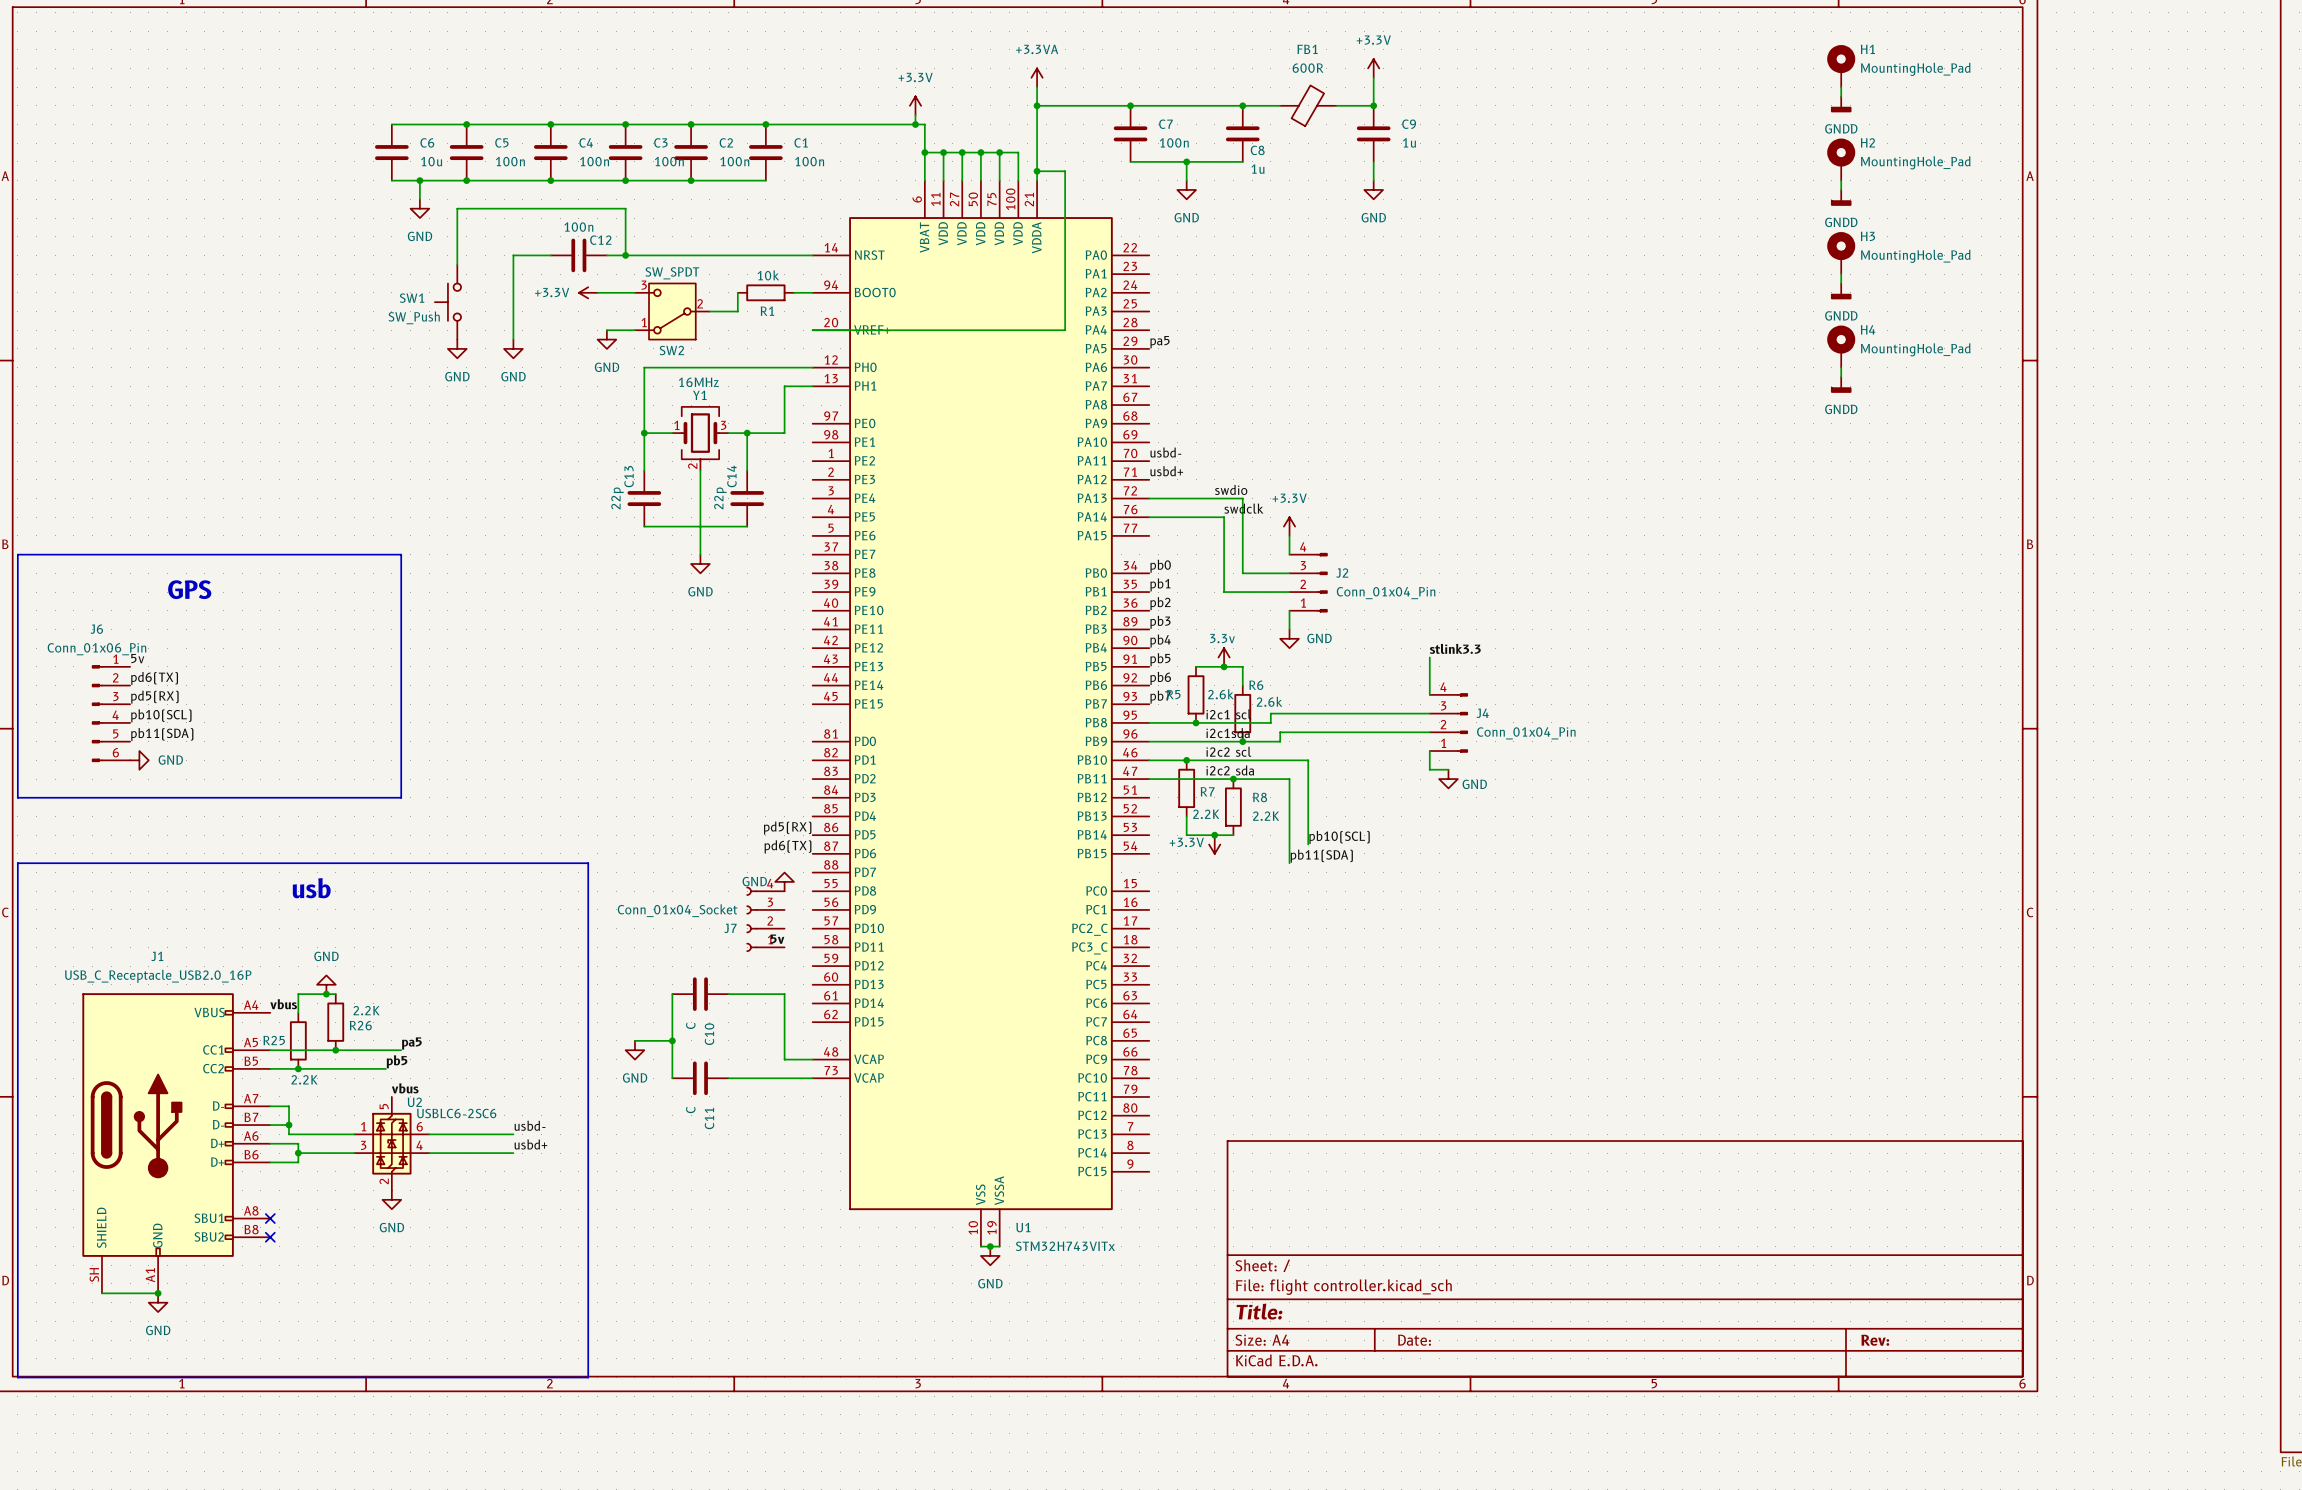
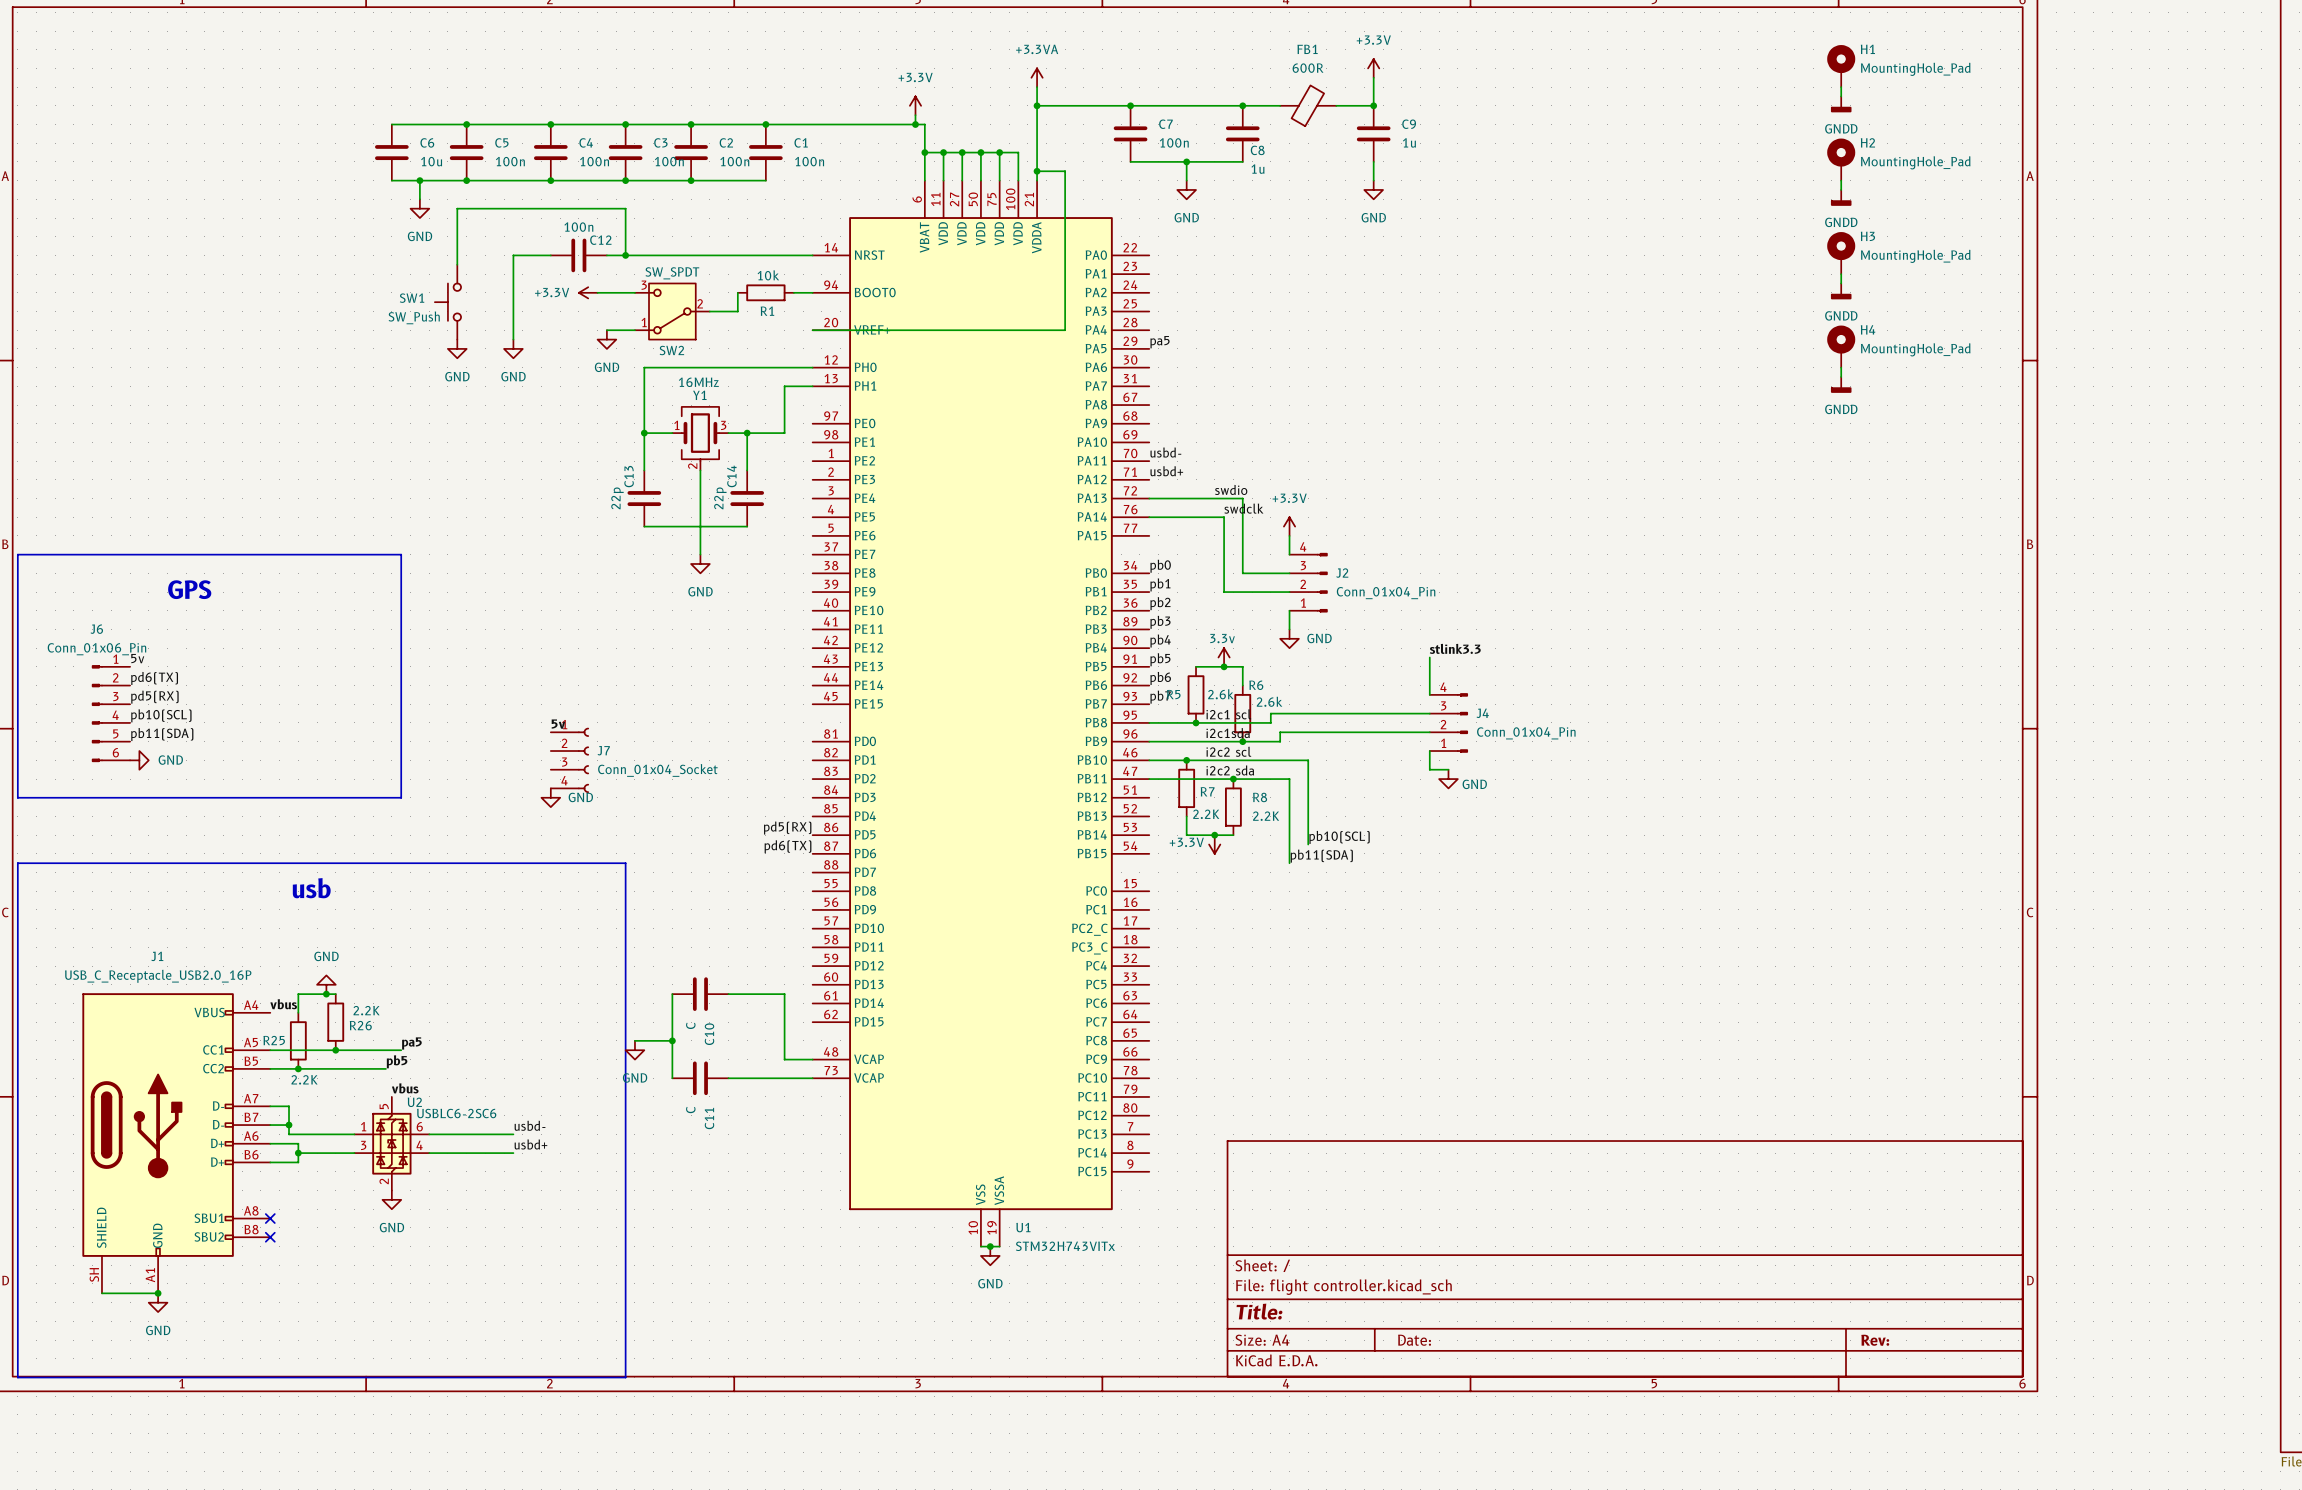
label: none -> 5v (558, 724)
power symbol: none -> GND (550, 797)
line: (588, 863) (588, 1377) -> (588, 863) (625, 863) (625, 1377) (588, 1377)
power symbol: GND (784, 881) -> none
J7 rotation: 0° (751, 919) -> 180° (583, 760)
J7 position: (765, 919) -> (569, 760)
label: 5v (777, 939) -> none

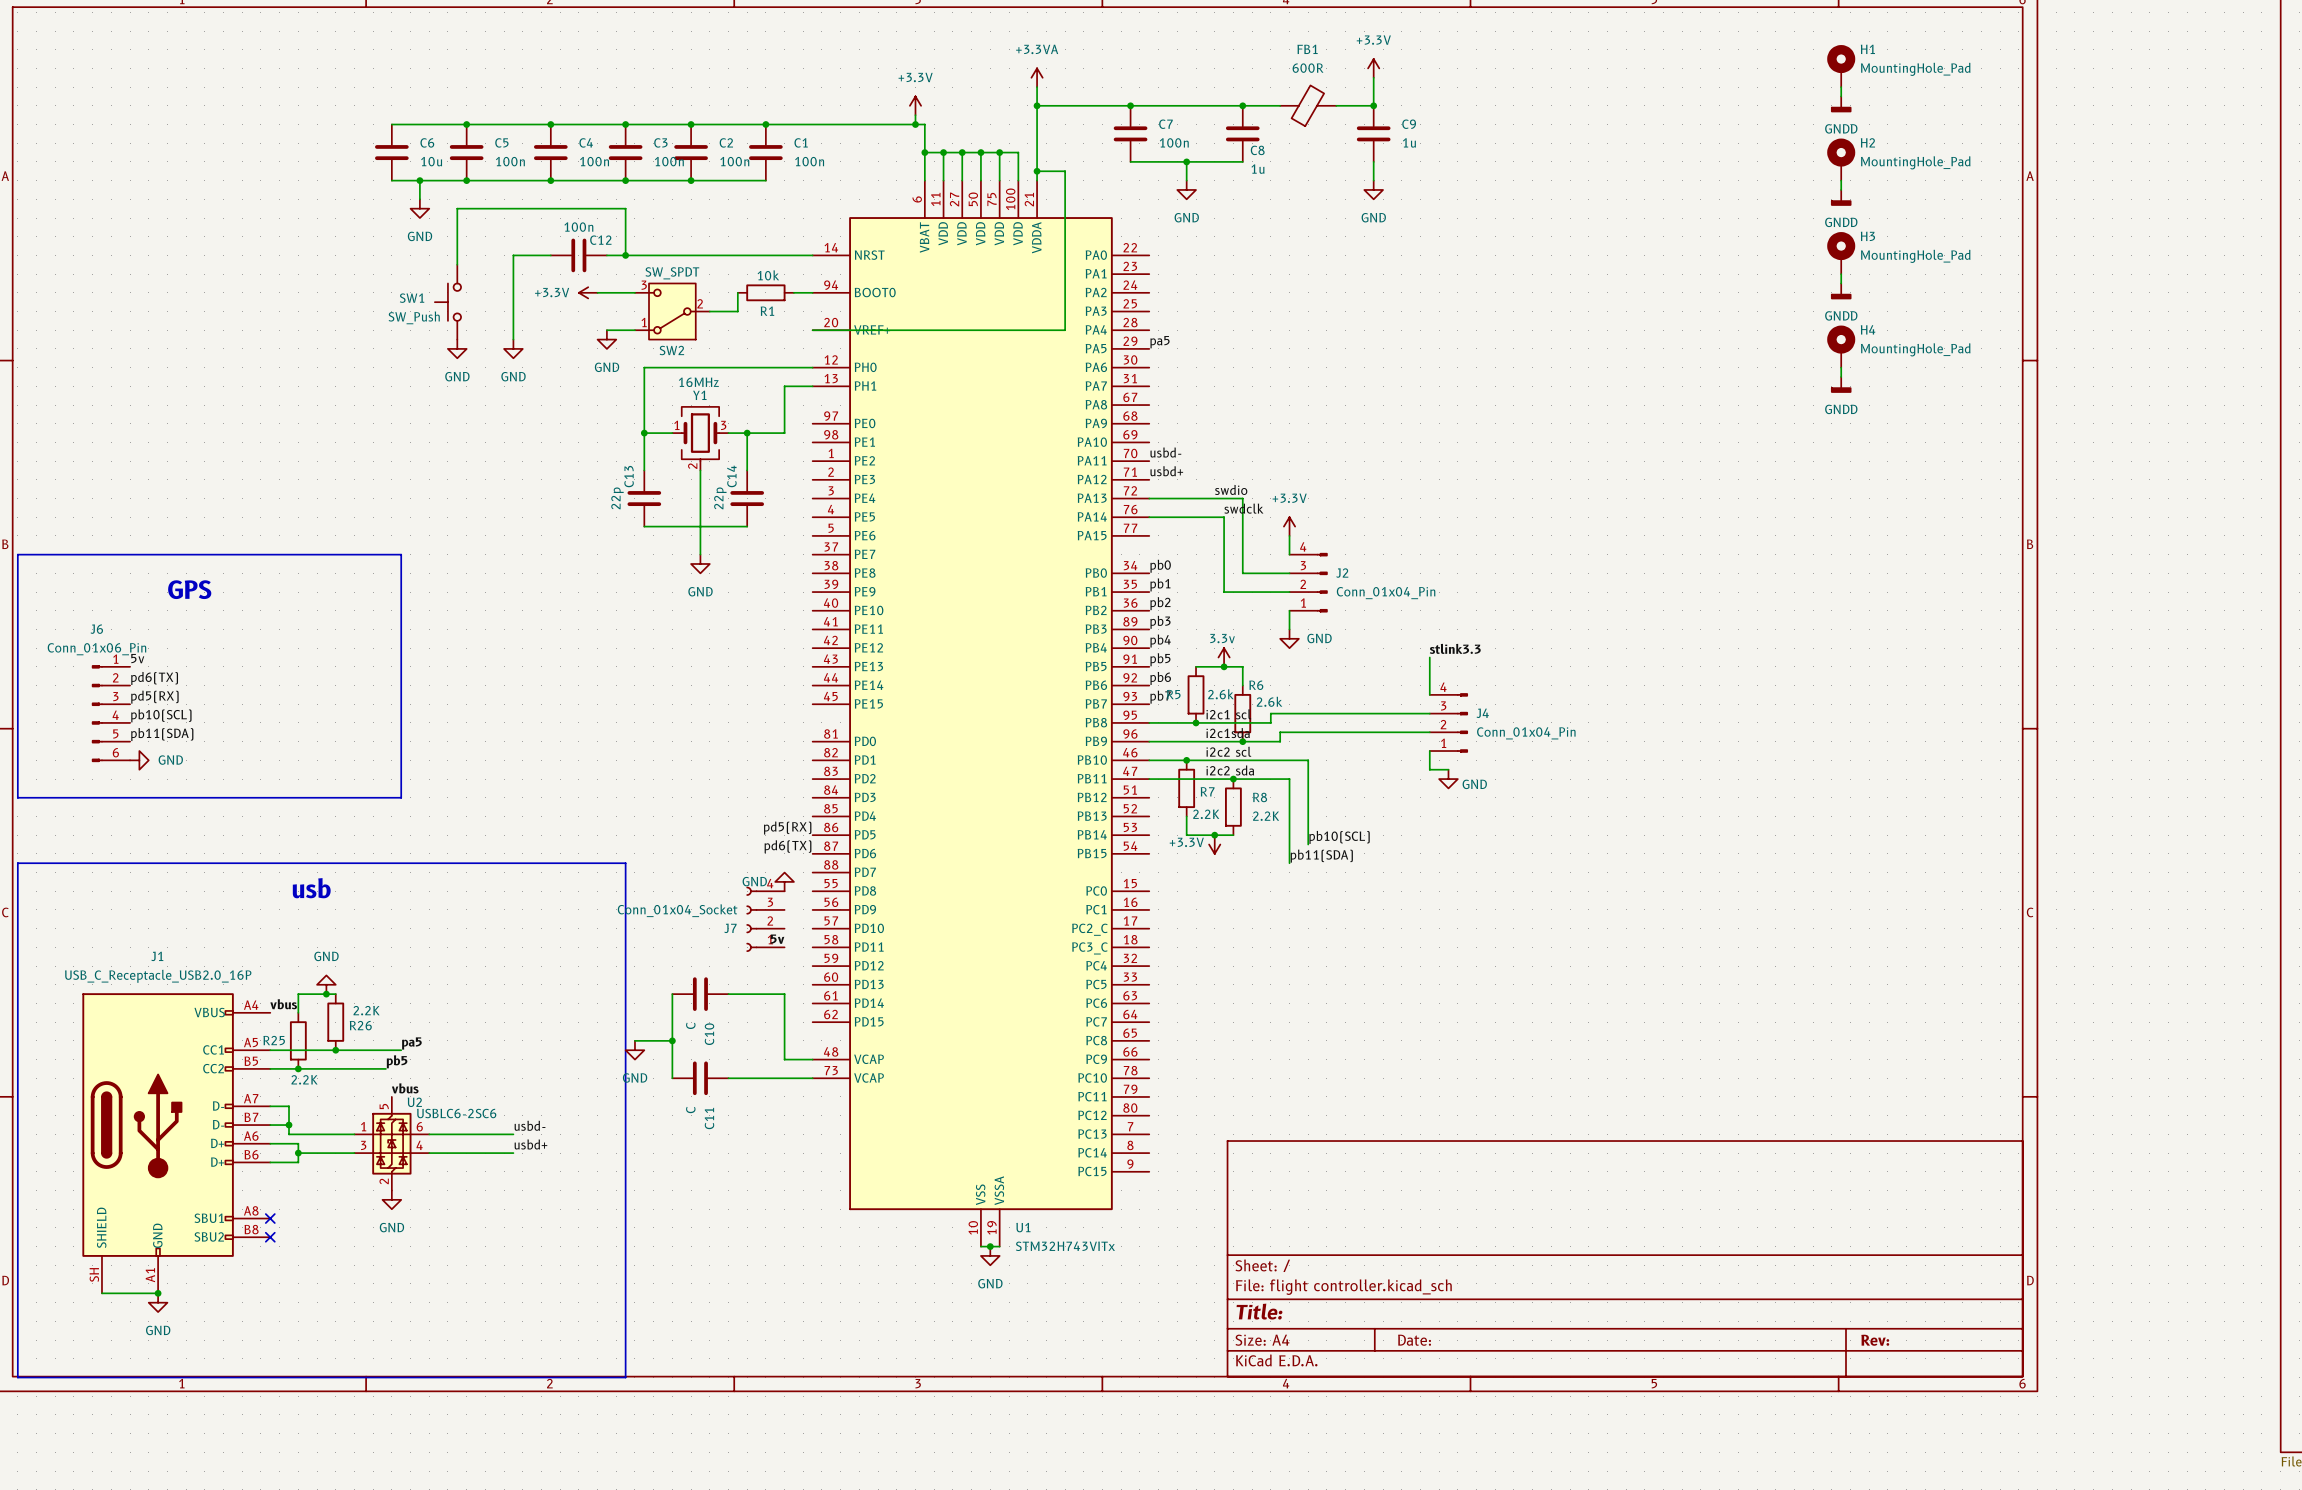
label: 5v (558, 724) -> none
J7 position: (569, 760) -> (765, 919)
J7 rotation: 0° (583, 760) -> 180° (751, 919)
power symbol: GND (550, 797) -> none
power symbol: none -> GND (784, 881)
label: none -> 5v (777, 939)

